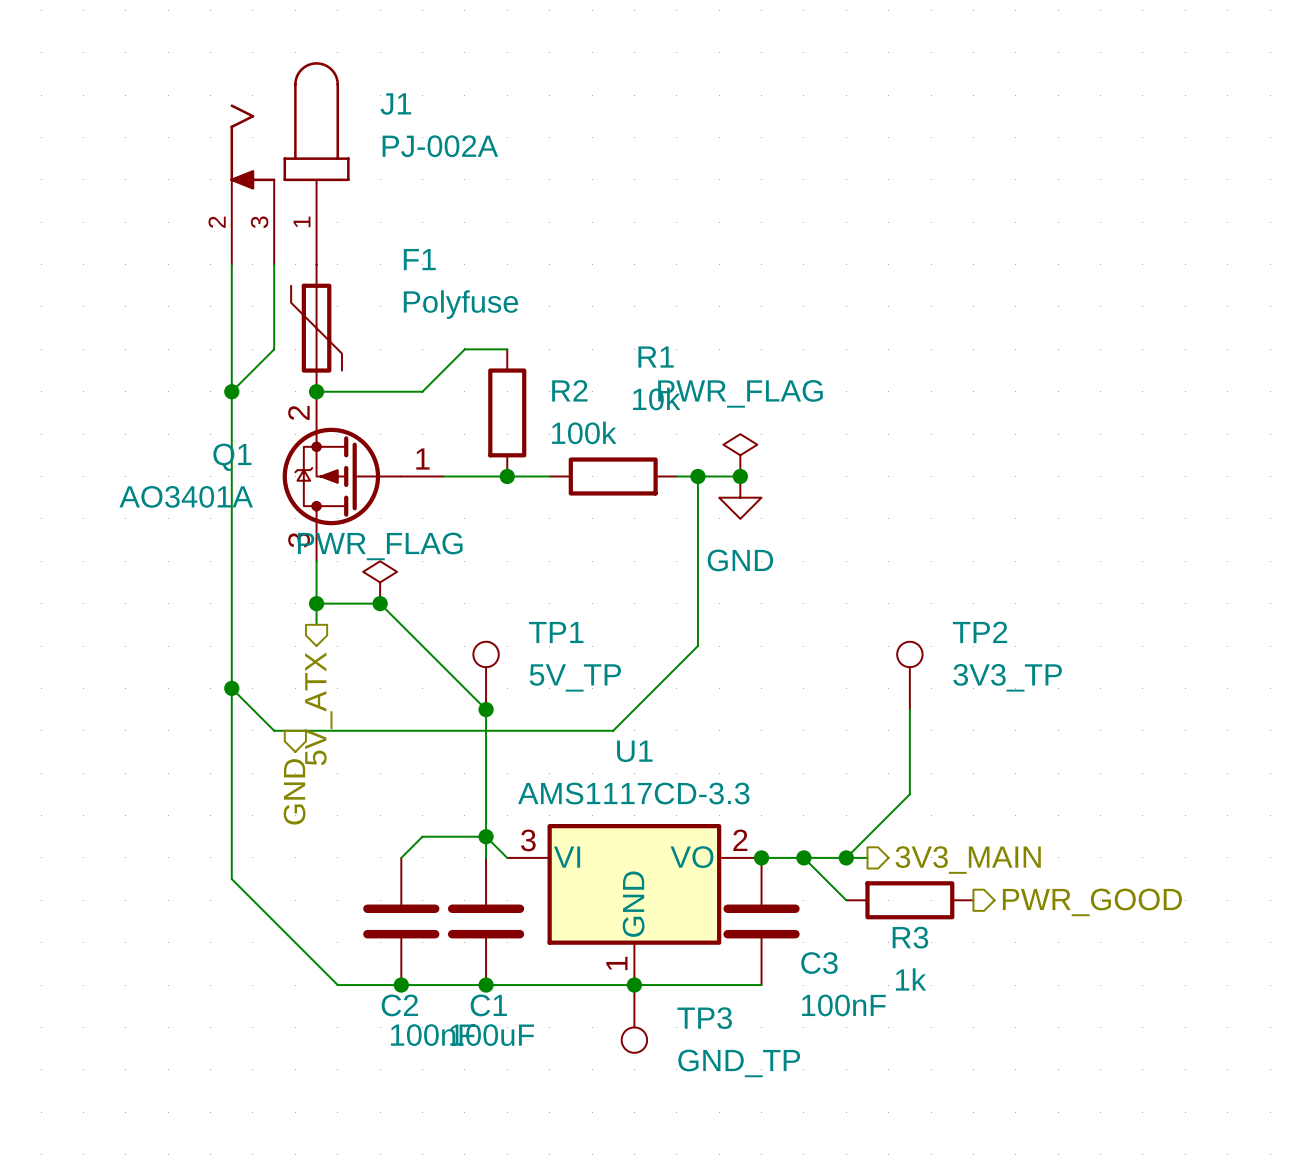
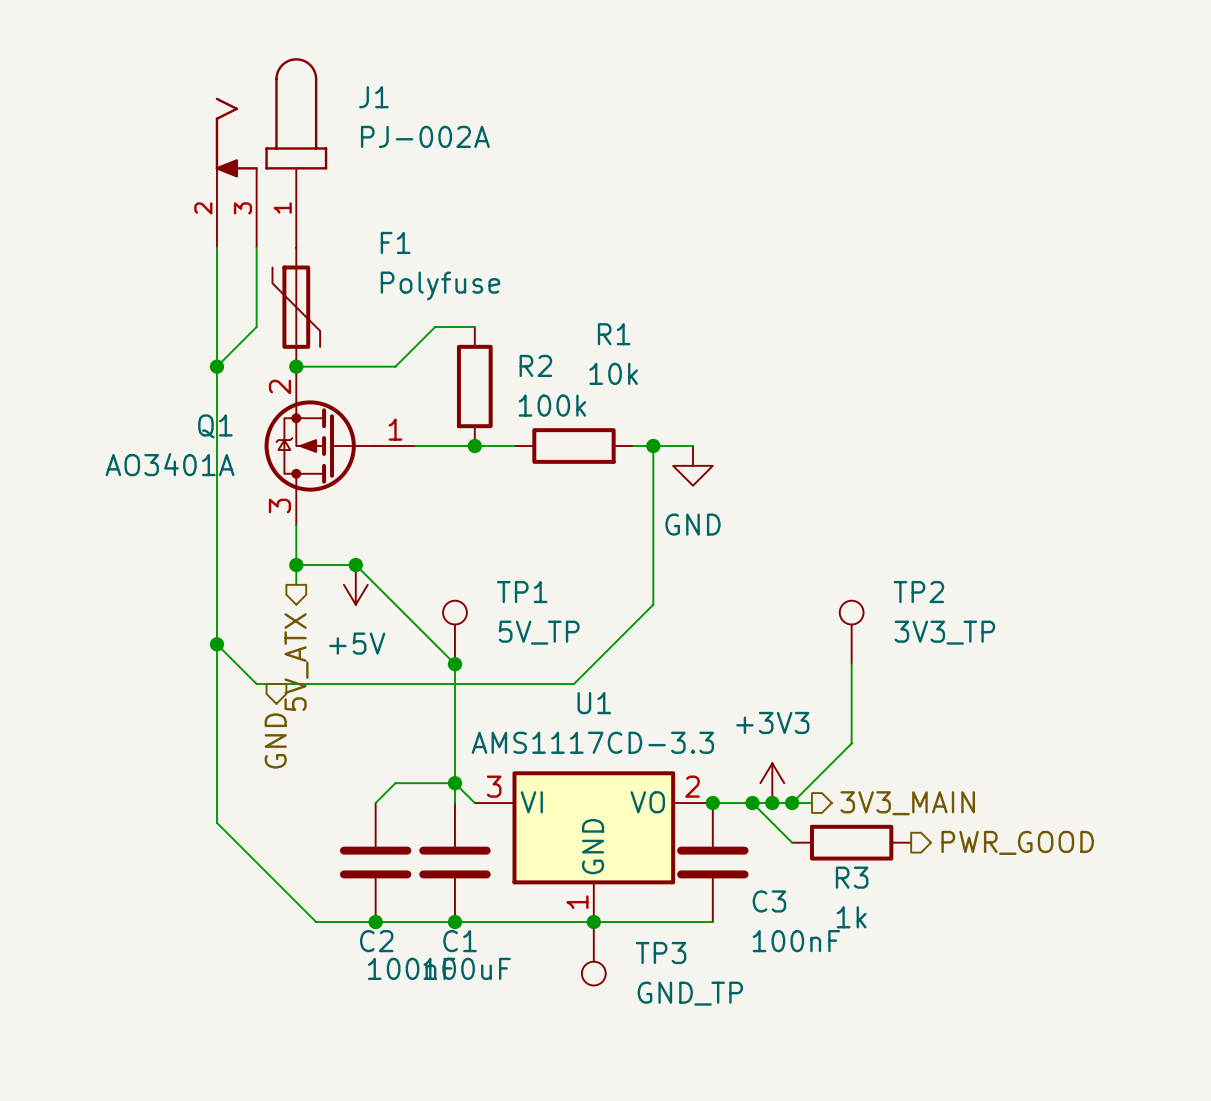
power symbol: PWR_FLAG (740, 455) -> none
junction: (740, 476) -> none
power symbol: PWR_FLAG (380, 582) -> none
power symbol: none -> +5V (355, 584)
power symbol: none -> +3V3 (772, 783)
junction: none -> (772, 803)

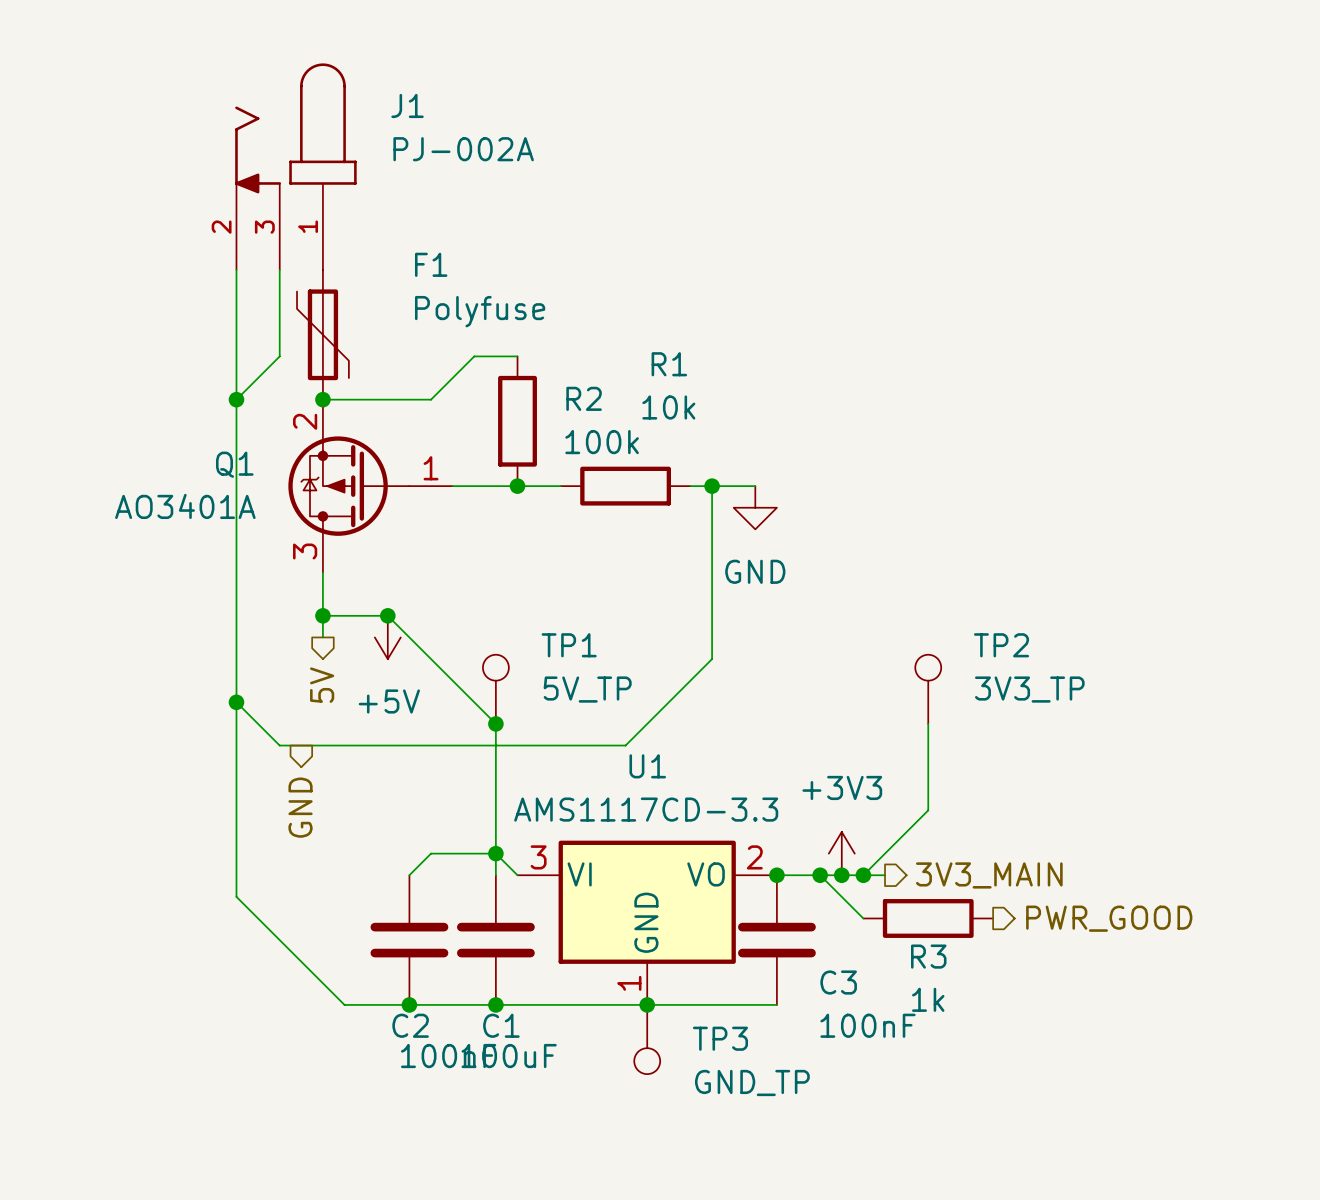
hierarchical label: 5V_ATX (296, 662) -> 5V (322, 685)

